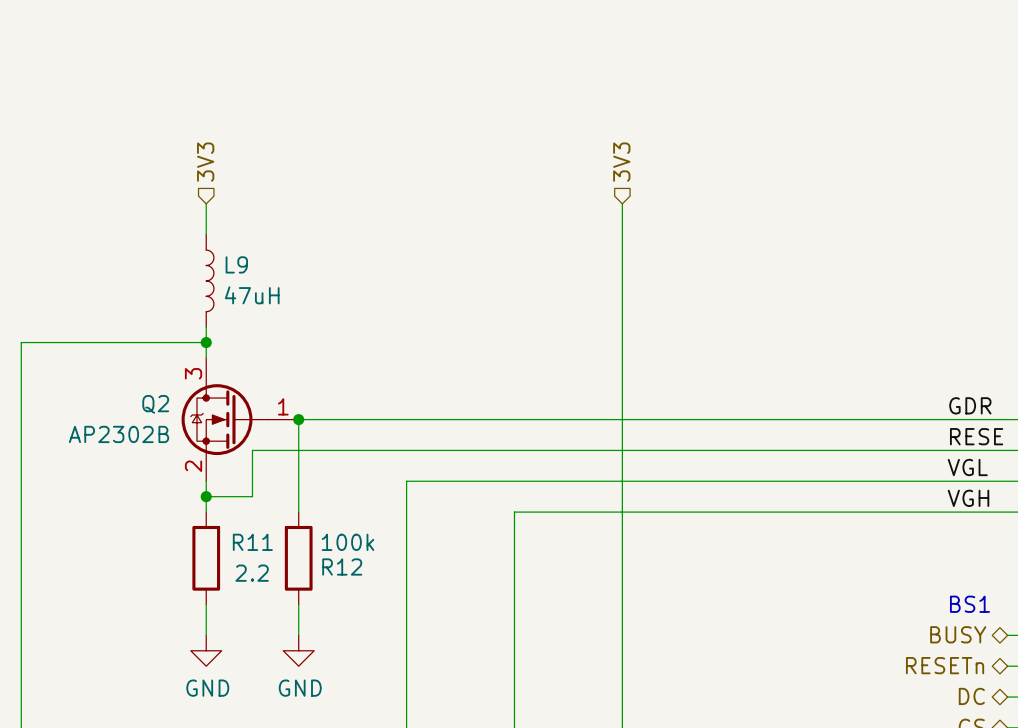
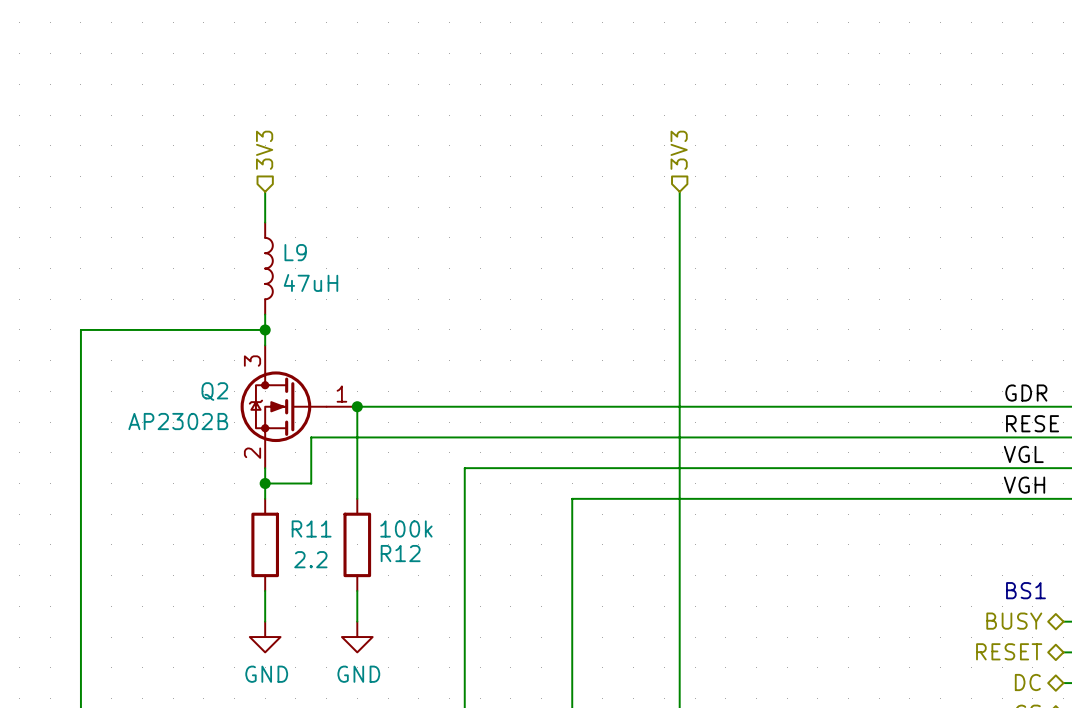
hierarchical label: RESETn (945, 665) -> RESET (1009, 651)

